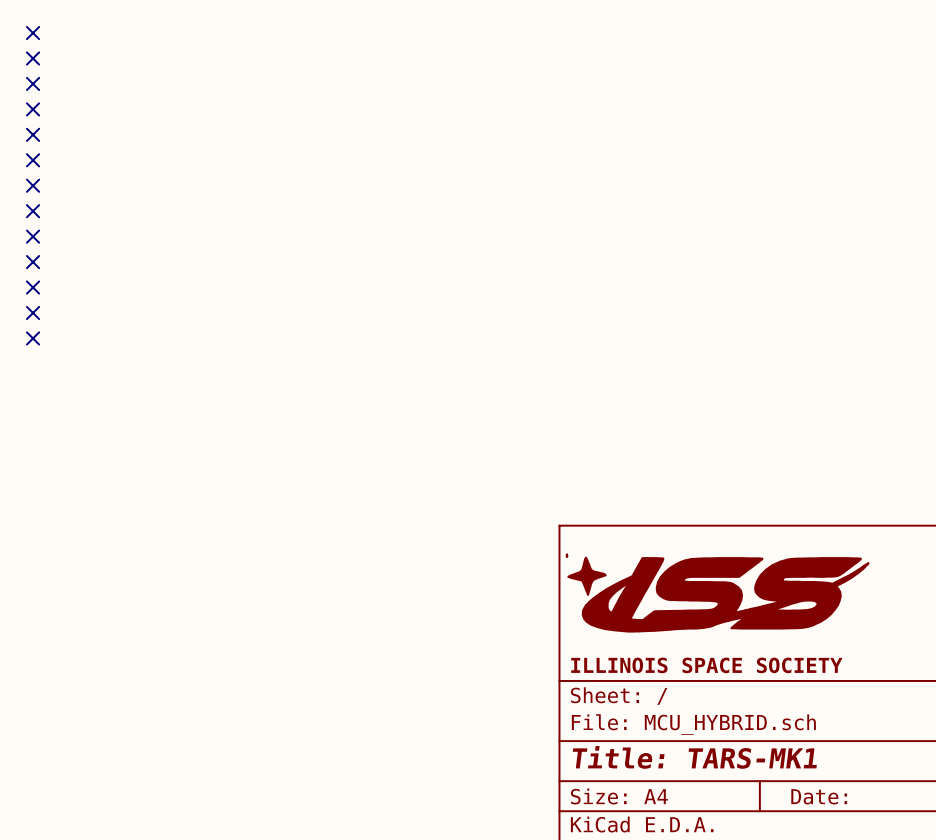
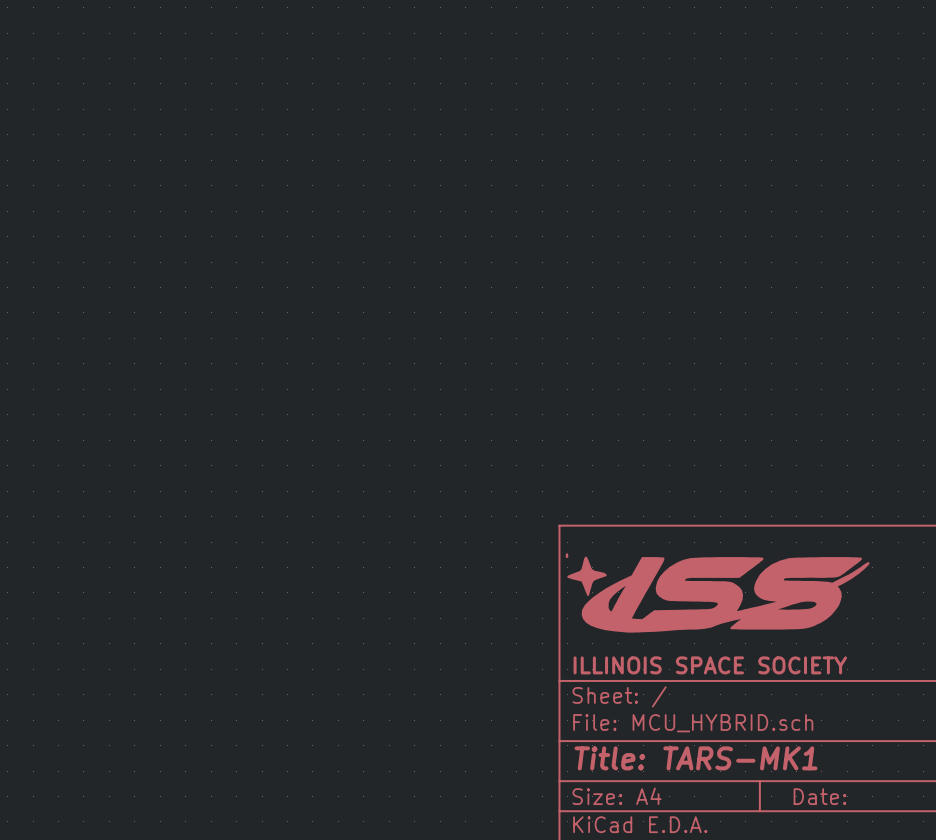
no-connect mark: (33, 33) -> none
no-connect mark: (33, 58) -> none
no-connect mark: (33, 83) -> none
no-connect mark: (33, 109) -> none
no-connect mark: (33, 134) -> none
no-connect mark: (33, 160) -> none
no-connect mark: (33, 185) -> none
no-connect mark: (33, 211) -> none
no-connect mark: (33, 236) -> none
no-connect mark: (33, 262) -> none
no-connect mark: (33, 287) -> none
no-connect mark: (33, 312) -> none
no-connect mark: (33, 338) -> none

